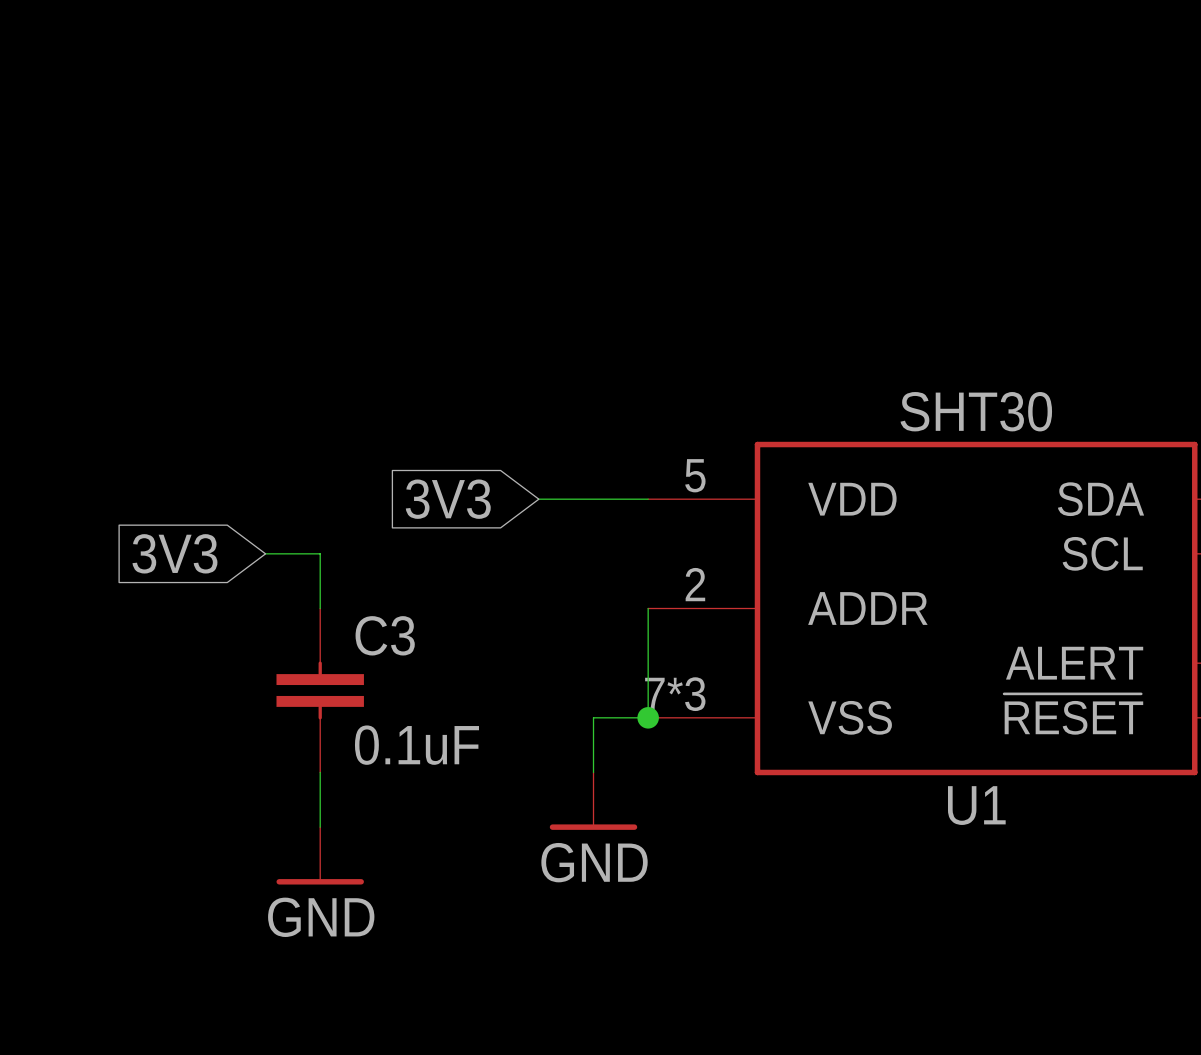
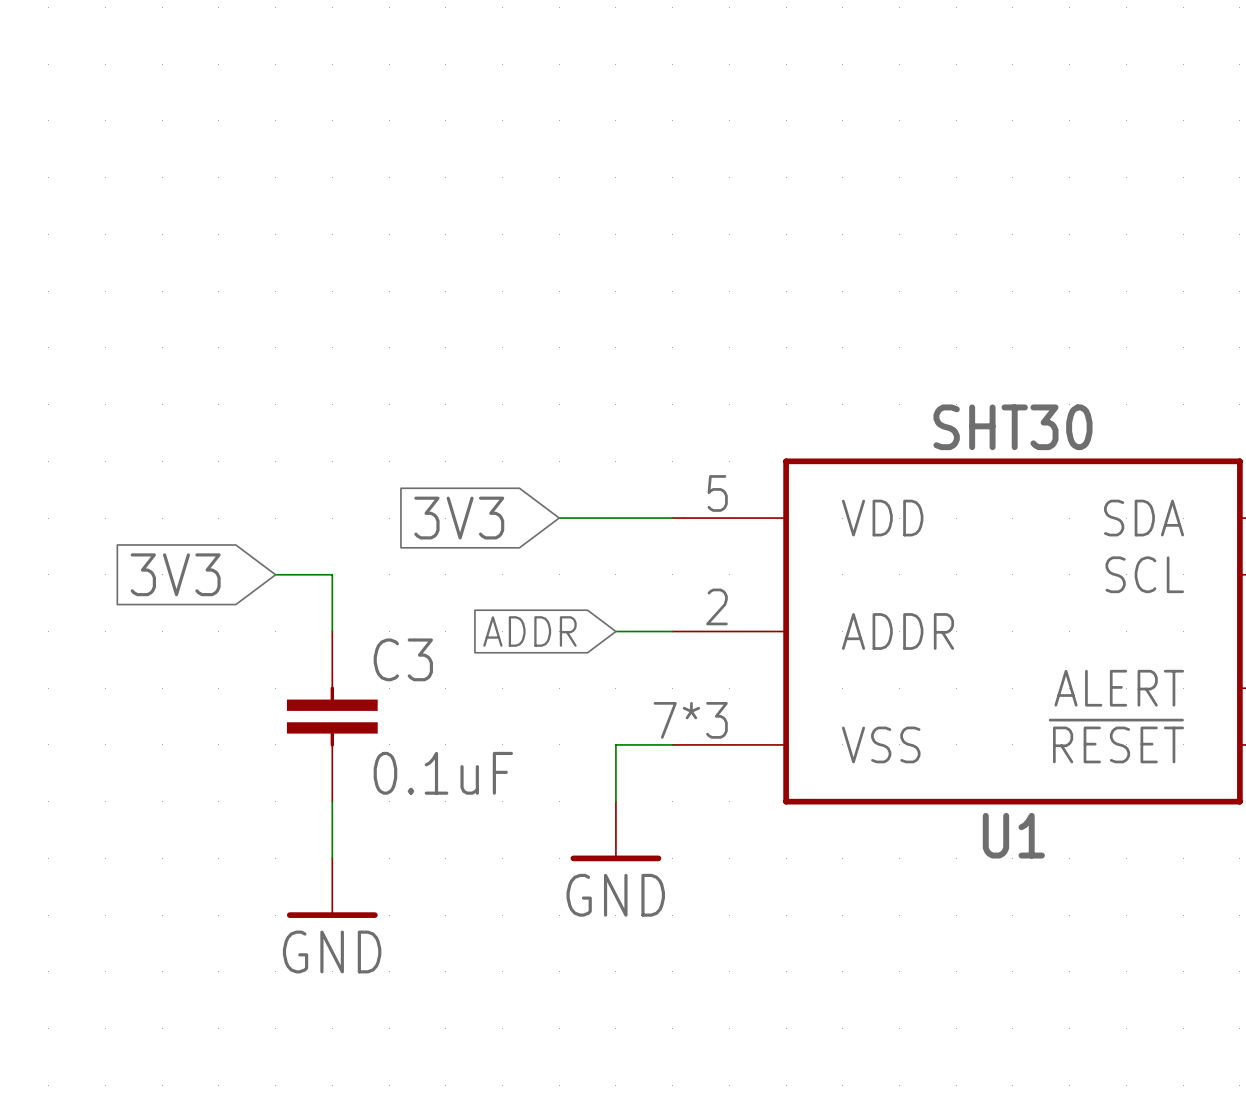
global label: none -> ADDR (529, 631)
wire: (648, 608) (648, 717) -> (672, 631) (615, 631)
junction: (648, 717) -> none

